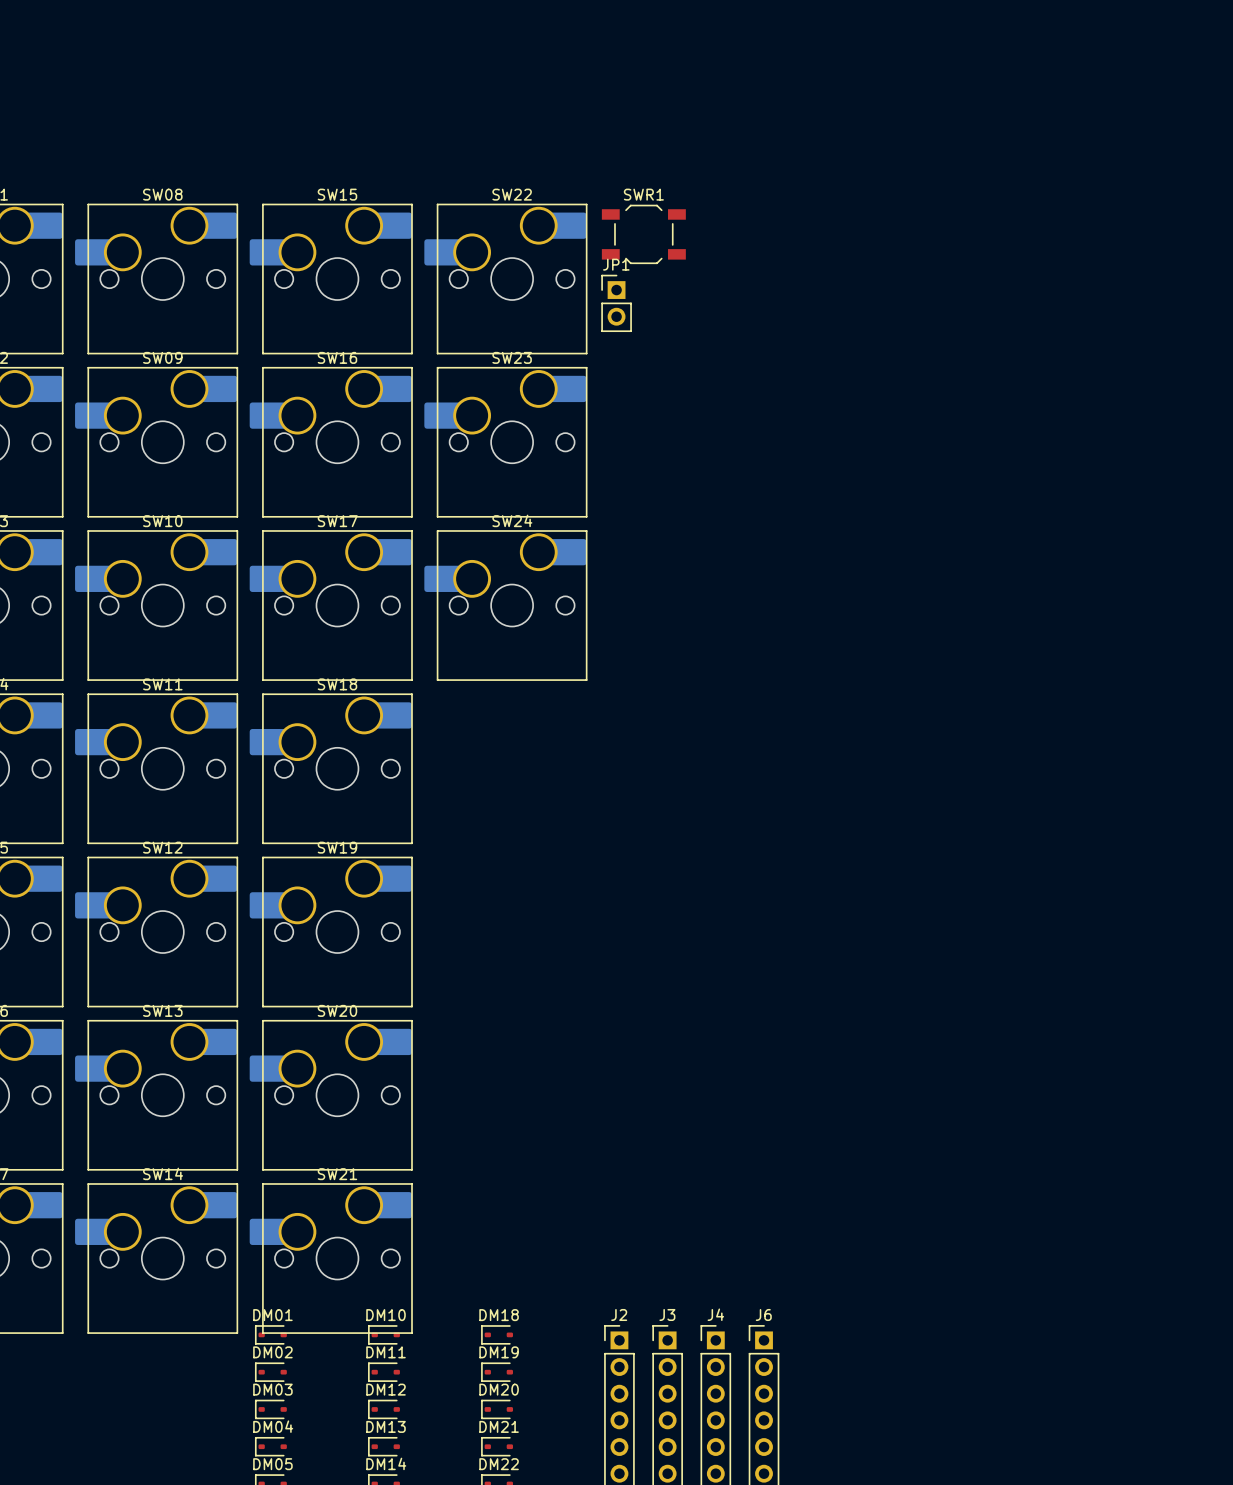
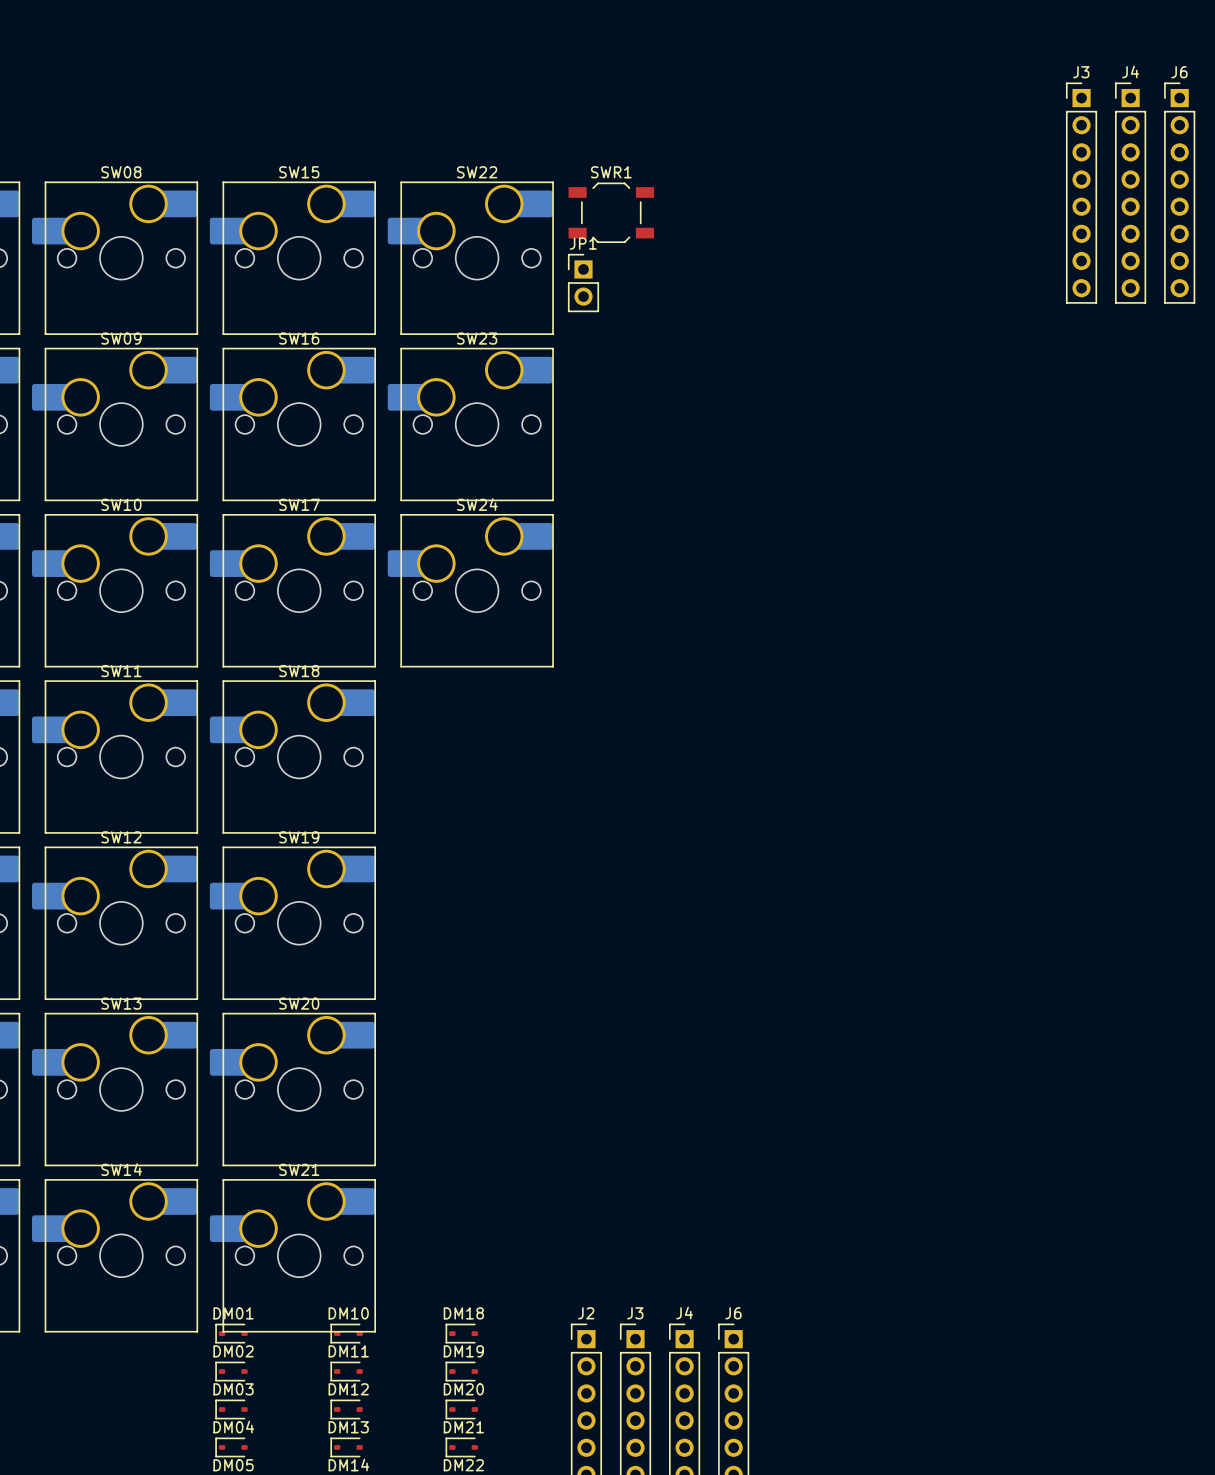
J3: none -> (1081, 193)
J4: none -> (1130, 193)
J6: none -> (1179, 193)

